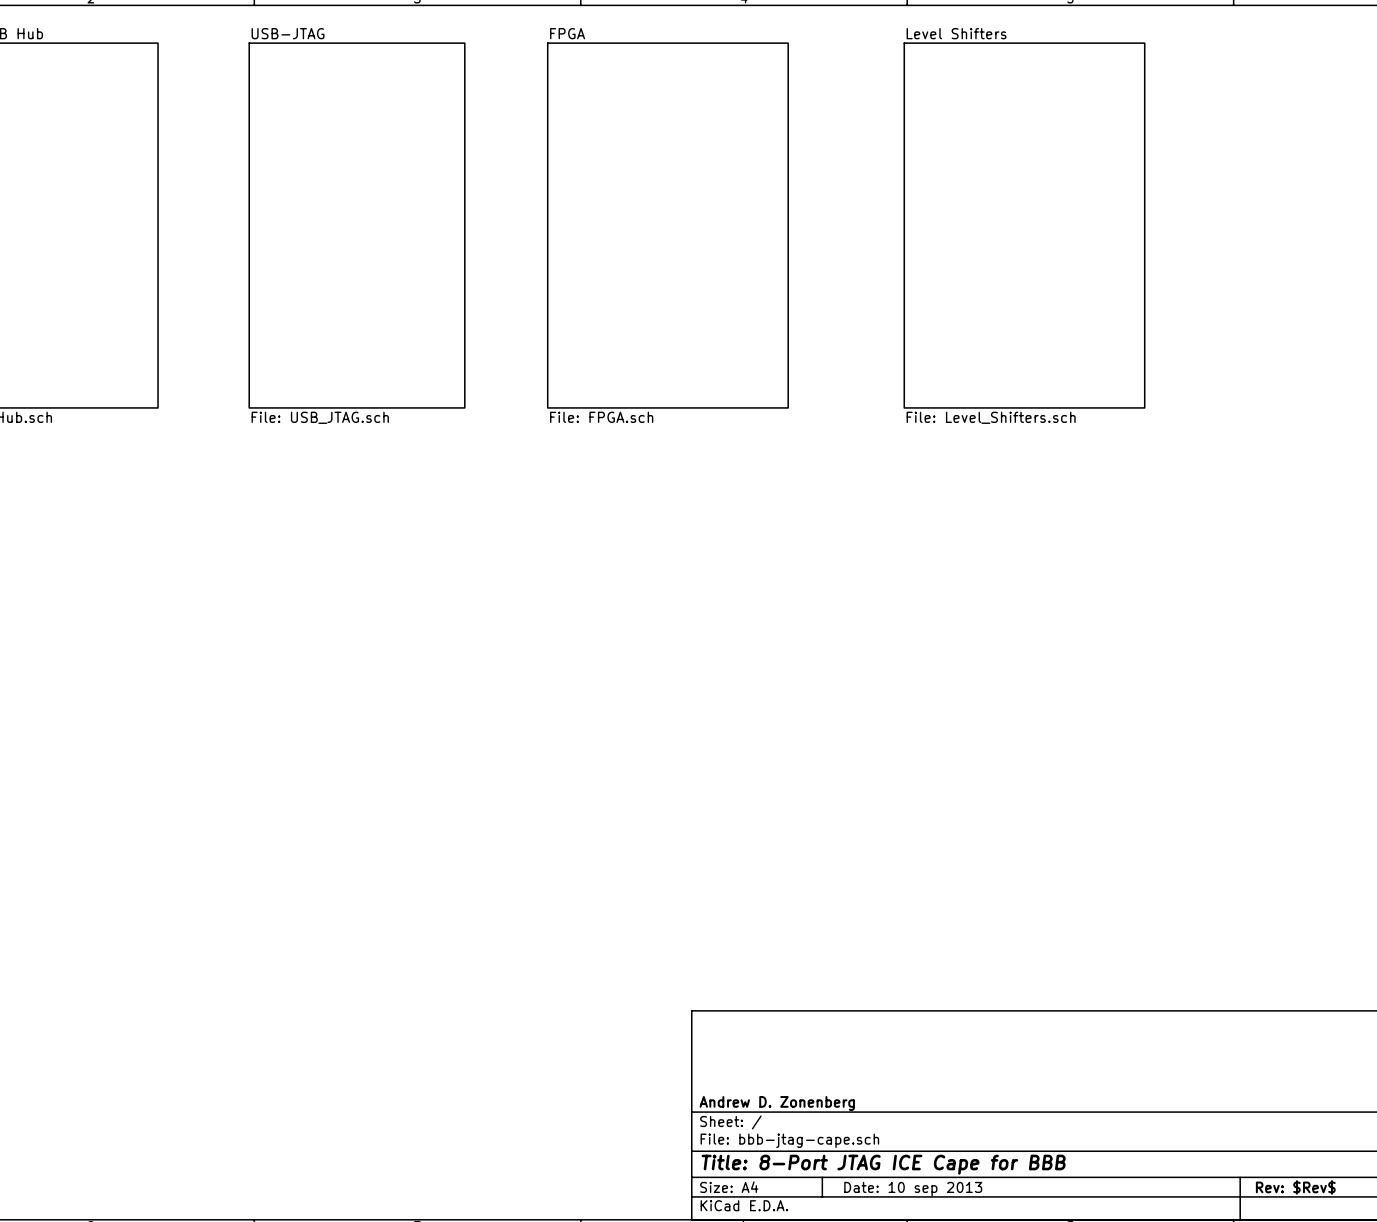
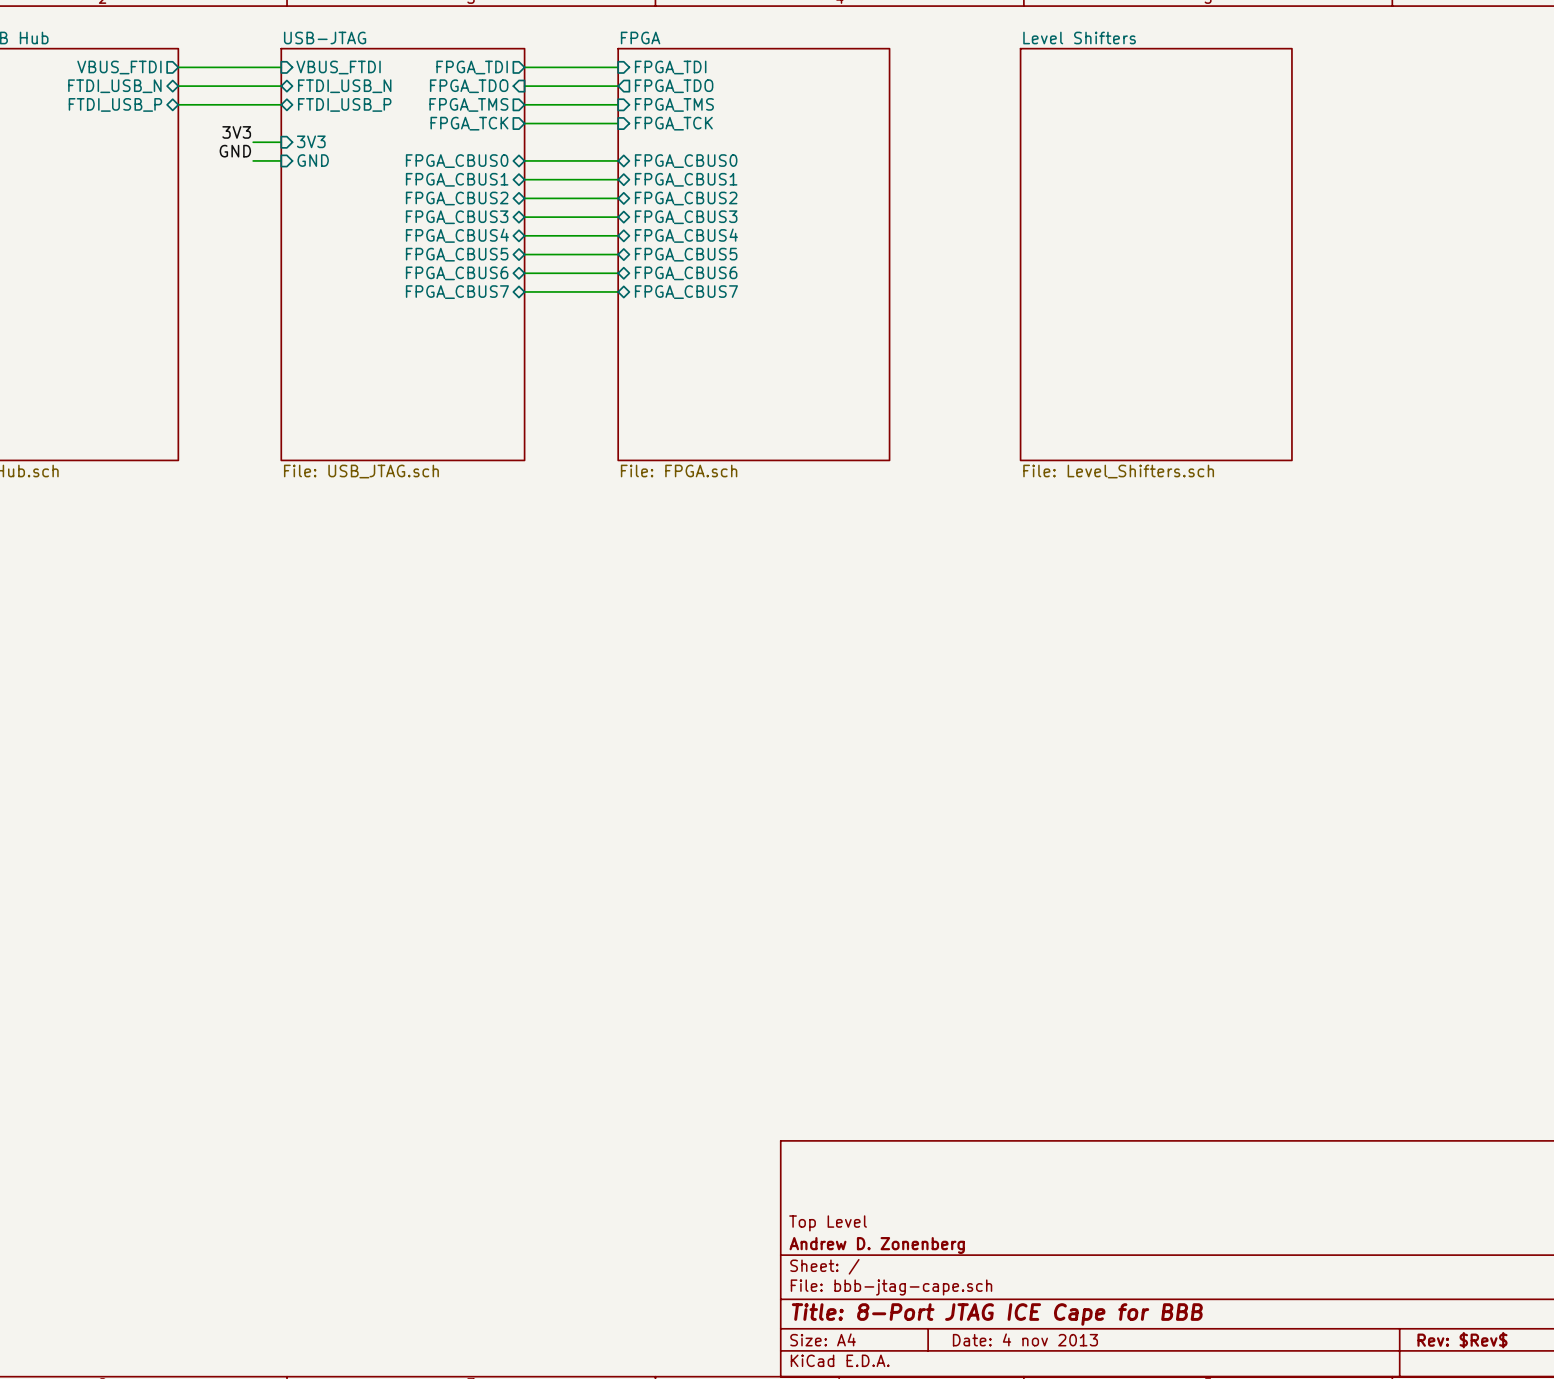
sheet pin: none -> VBUS_FTDI (119, 67)
wire: none -> (178, 67) (281, 67)
sheet pin: none -> VBUS_FTDI (338, 67)
sheet pin: none -> FPGA_TDI (472, 67)
wire: none -> (524, 67) (618, 67)
sheet pin: none -> FPGA_TDI (670, 67)
sheet pin: none -> FTDI_USB_N (114, 86)
wire: none -> (178, 86) (281, 86)
sheet pin: none -> FTDI_USB_N (344, 86)
sheet pin: none -> FPGA_TDO (469, 86)
wire: none -> (524, 86) (618, 86)
sheet pin: none -> FPGA_TDO (674, 86)
sheet pin: none -> FTDI_USB_P (115, 104)
wire: none -> (178, 104) (281, 104)
sheet pin: none -> FTDI_USB_P (344, 104)
sheet pin: none -> FPGA_TMS (468, 104)
wire: none -> (524, 104) (618, 104)
sheet pin: none -> FPGA_TMS (674, 104)
sheet pin: none -> FPGA_TCK (469, 123)
wire: none -> (524, 123) (618, 123)
sheet pin: none -> FPGA_TCK (673, 123)
label: none -> 3V3 (236, 132)
sheet pin: none -> 3V3 (311, 141)
wire: none -> (253, 142) (281, 142)
label: none -> GND (235, 151)
wire: none -> (253, 160) (281, 160)
sheet pin: none -> GND (313, 160)
sheet pin: none -> FPGA_CBUS0 (457, 161)
wire: none -> (524, 160) (618, 160)
sheet pin: none -> FPGA_CBUS0 (686, 161)
sheet pin: none -> FPGA_CBUS1 (457, 179)
wire: none -> (524, 179) (618, 179)
sheet pin: none -> FPGA_CBUS1 (686, 179)
sheet pin: none -> FPGA_CBUS2 (457, 198)
wire: none -> (524, 198) (618, 198)
sheet pin: none -> FPGA_CBUS2 (686, 198)
sheet pin: none -> FPGA_CBUS3 (457, 217)
wire: none -> (524, 217) (618, 217)
sheet pin: none -> FPGA_CBUS3 (686, 217)
sheet pin: none -> FPGA_CBUS4 (457, 235)
wire: none -> (524, 235) (618, 235)
sheet pin: none -> FPGA_CBUS4 (686, 235)
sheet pin: none -> FPGA_CBUS5 (457, 254)
wire: none -> (524, 254) (618, 254)
sheet pin: none -> FPGA_CBUS5 (686, 254)
sheet pin: none -> FPGA_CBUS6 (457, 273)
wire: none -> (524, 273) (618, 273)
sheet pin: none -> FPGA_CBUS6 (686, 273)
sheet pin: none -> FPGA_CBUS7 (457, 292)
wire: none -> (524, 291) (618, 291)
sheet pin: none -> FPGA_CBUS7 (686, 292)
title block: none -> Top Level (828, 1223)
title block: Date: 10 sep 2013 (913, 1189) -> Date: 4 nov 2013 (1025, 1339)

